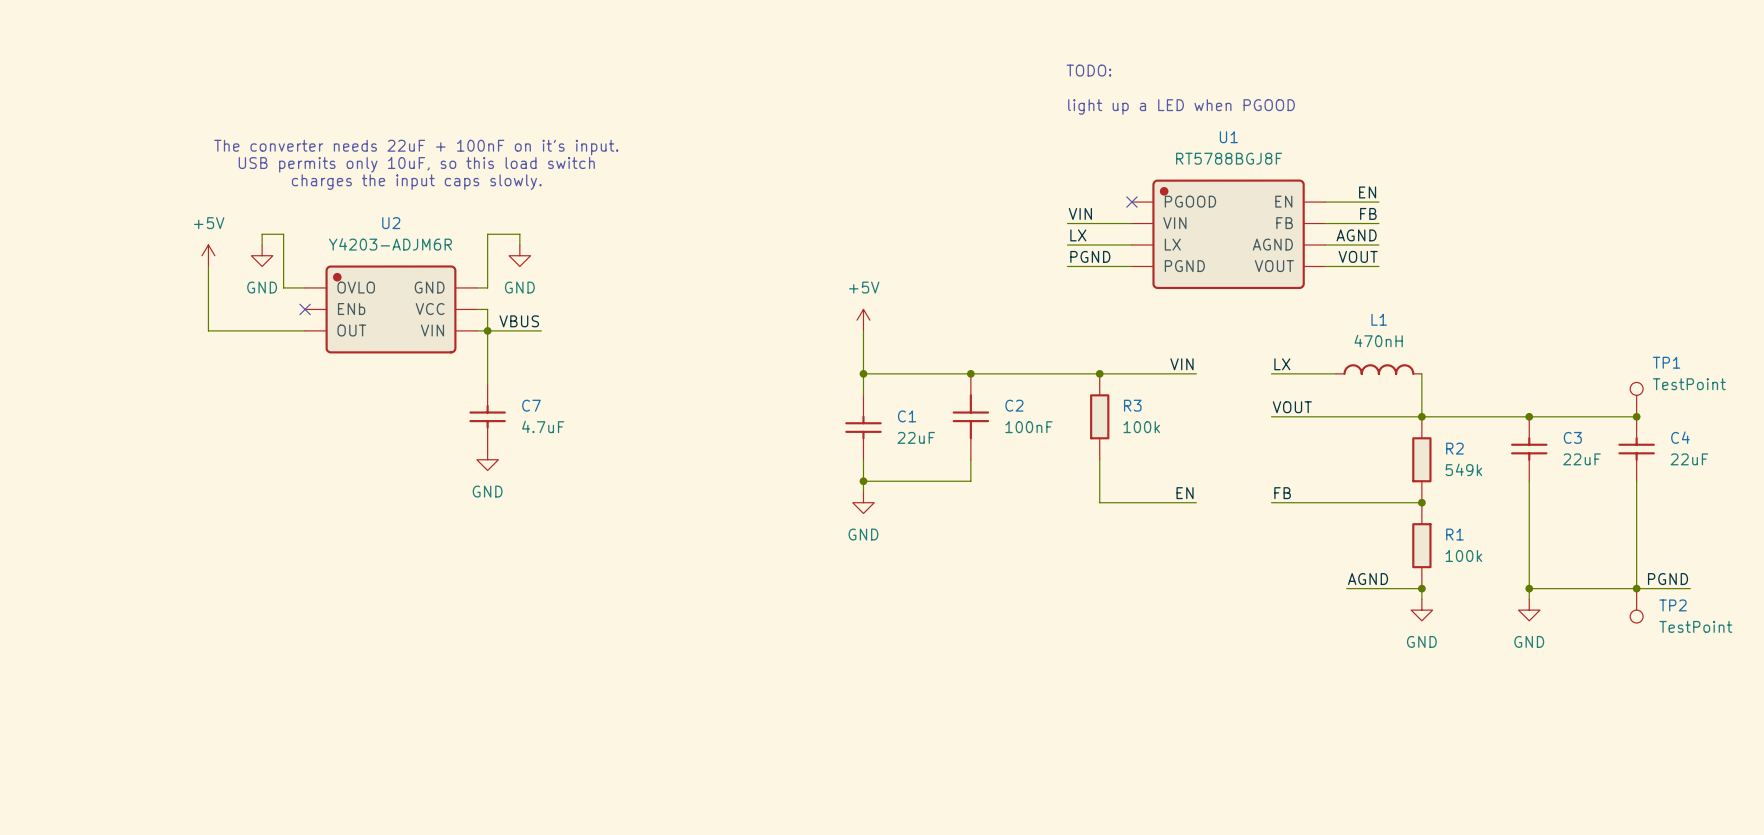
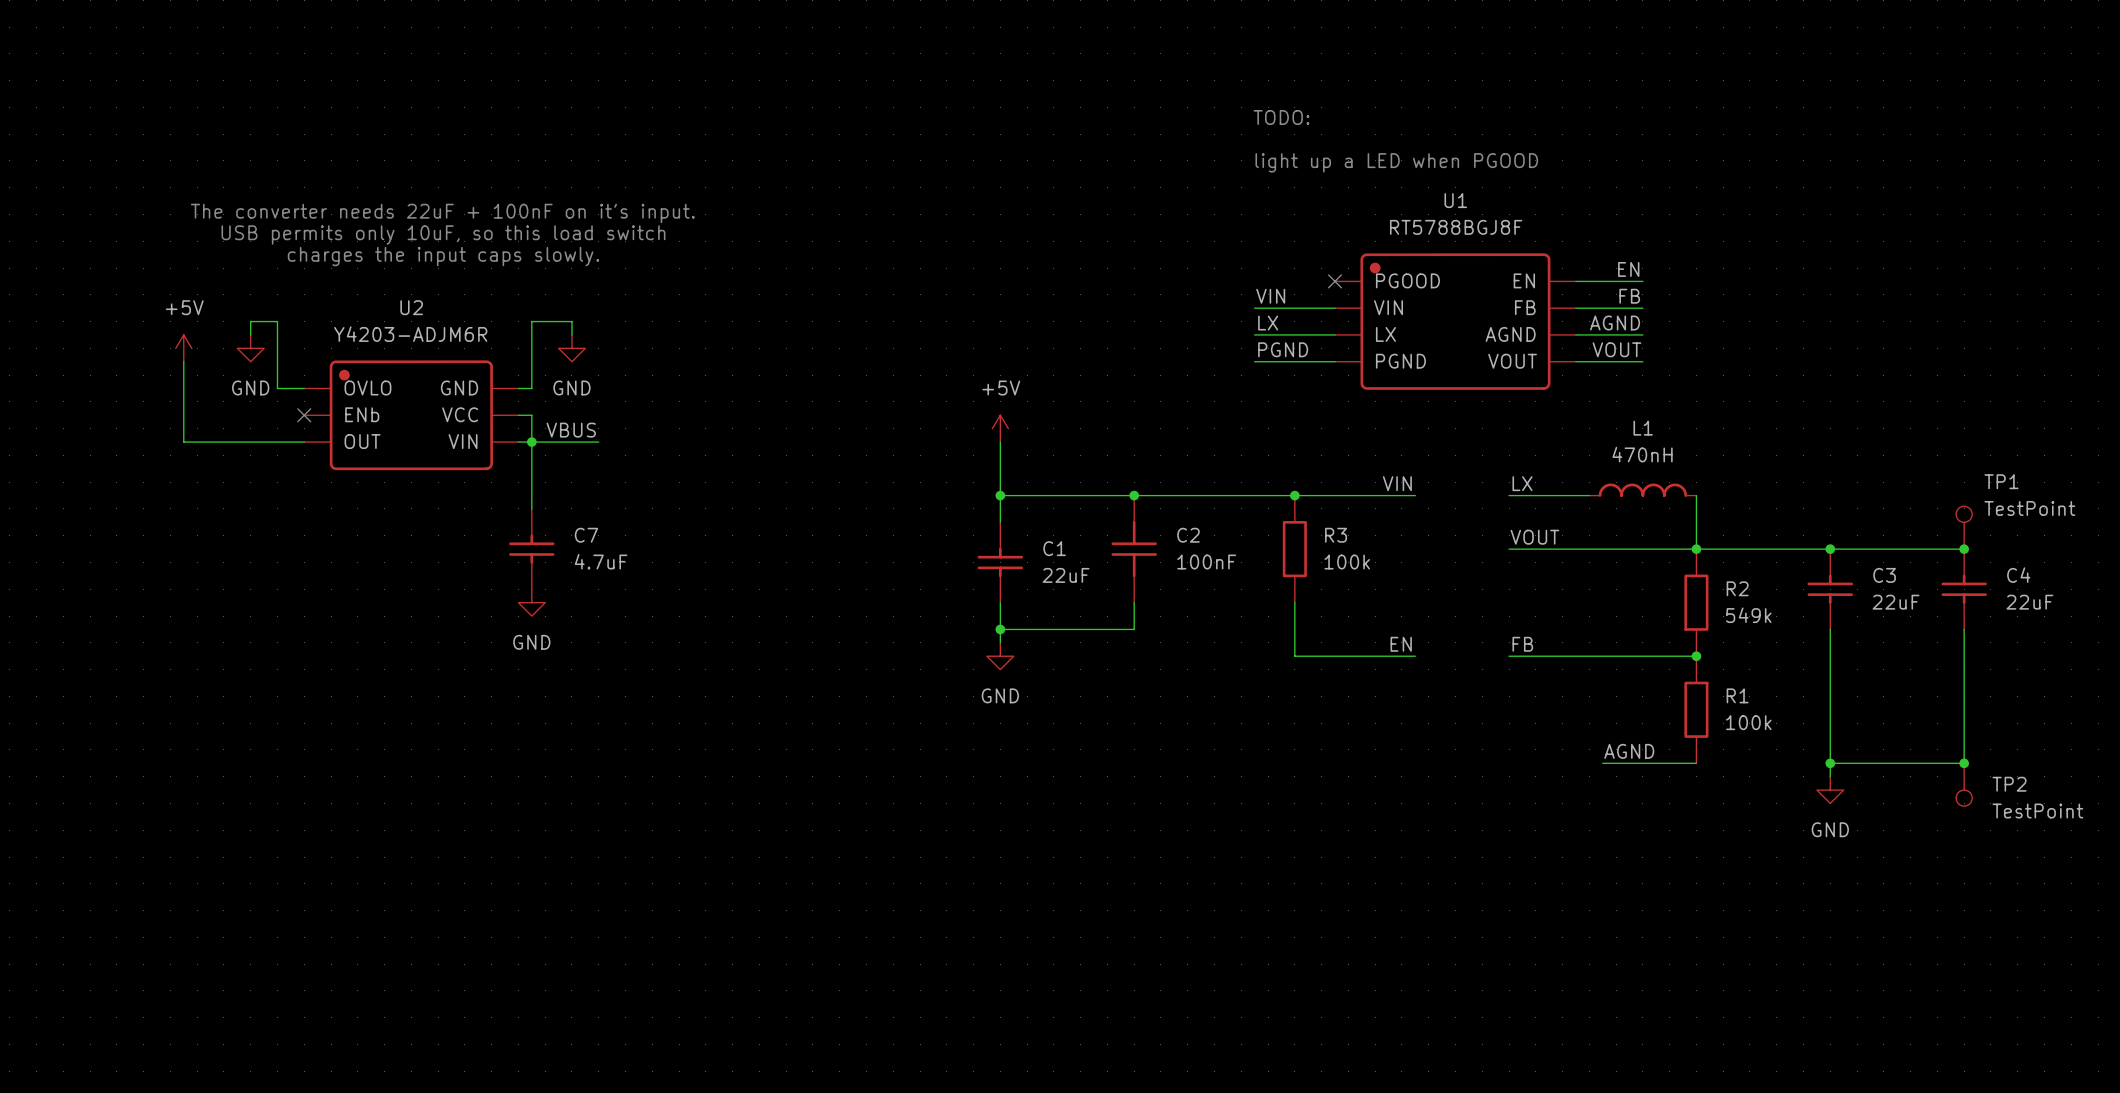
label: PGND (1668, 579) -> none
wire: (1421, 588) (1421, 599) -> none
junction: (1421, 588) -> none
wire: (1636, 588) (1690, 588) -> none
power symbol: GND (1421, 610) -> none

